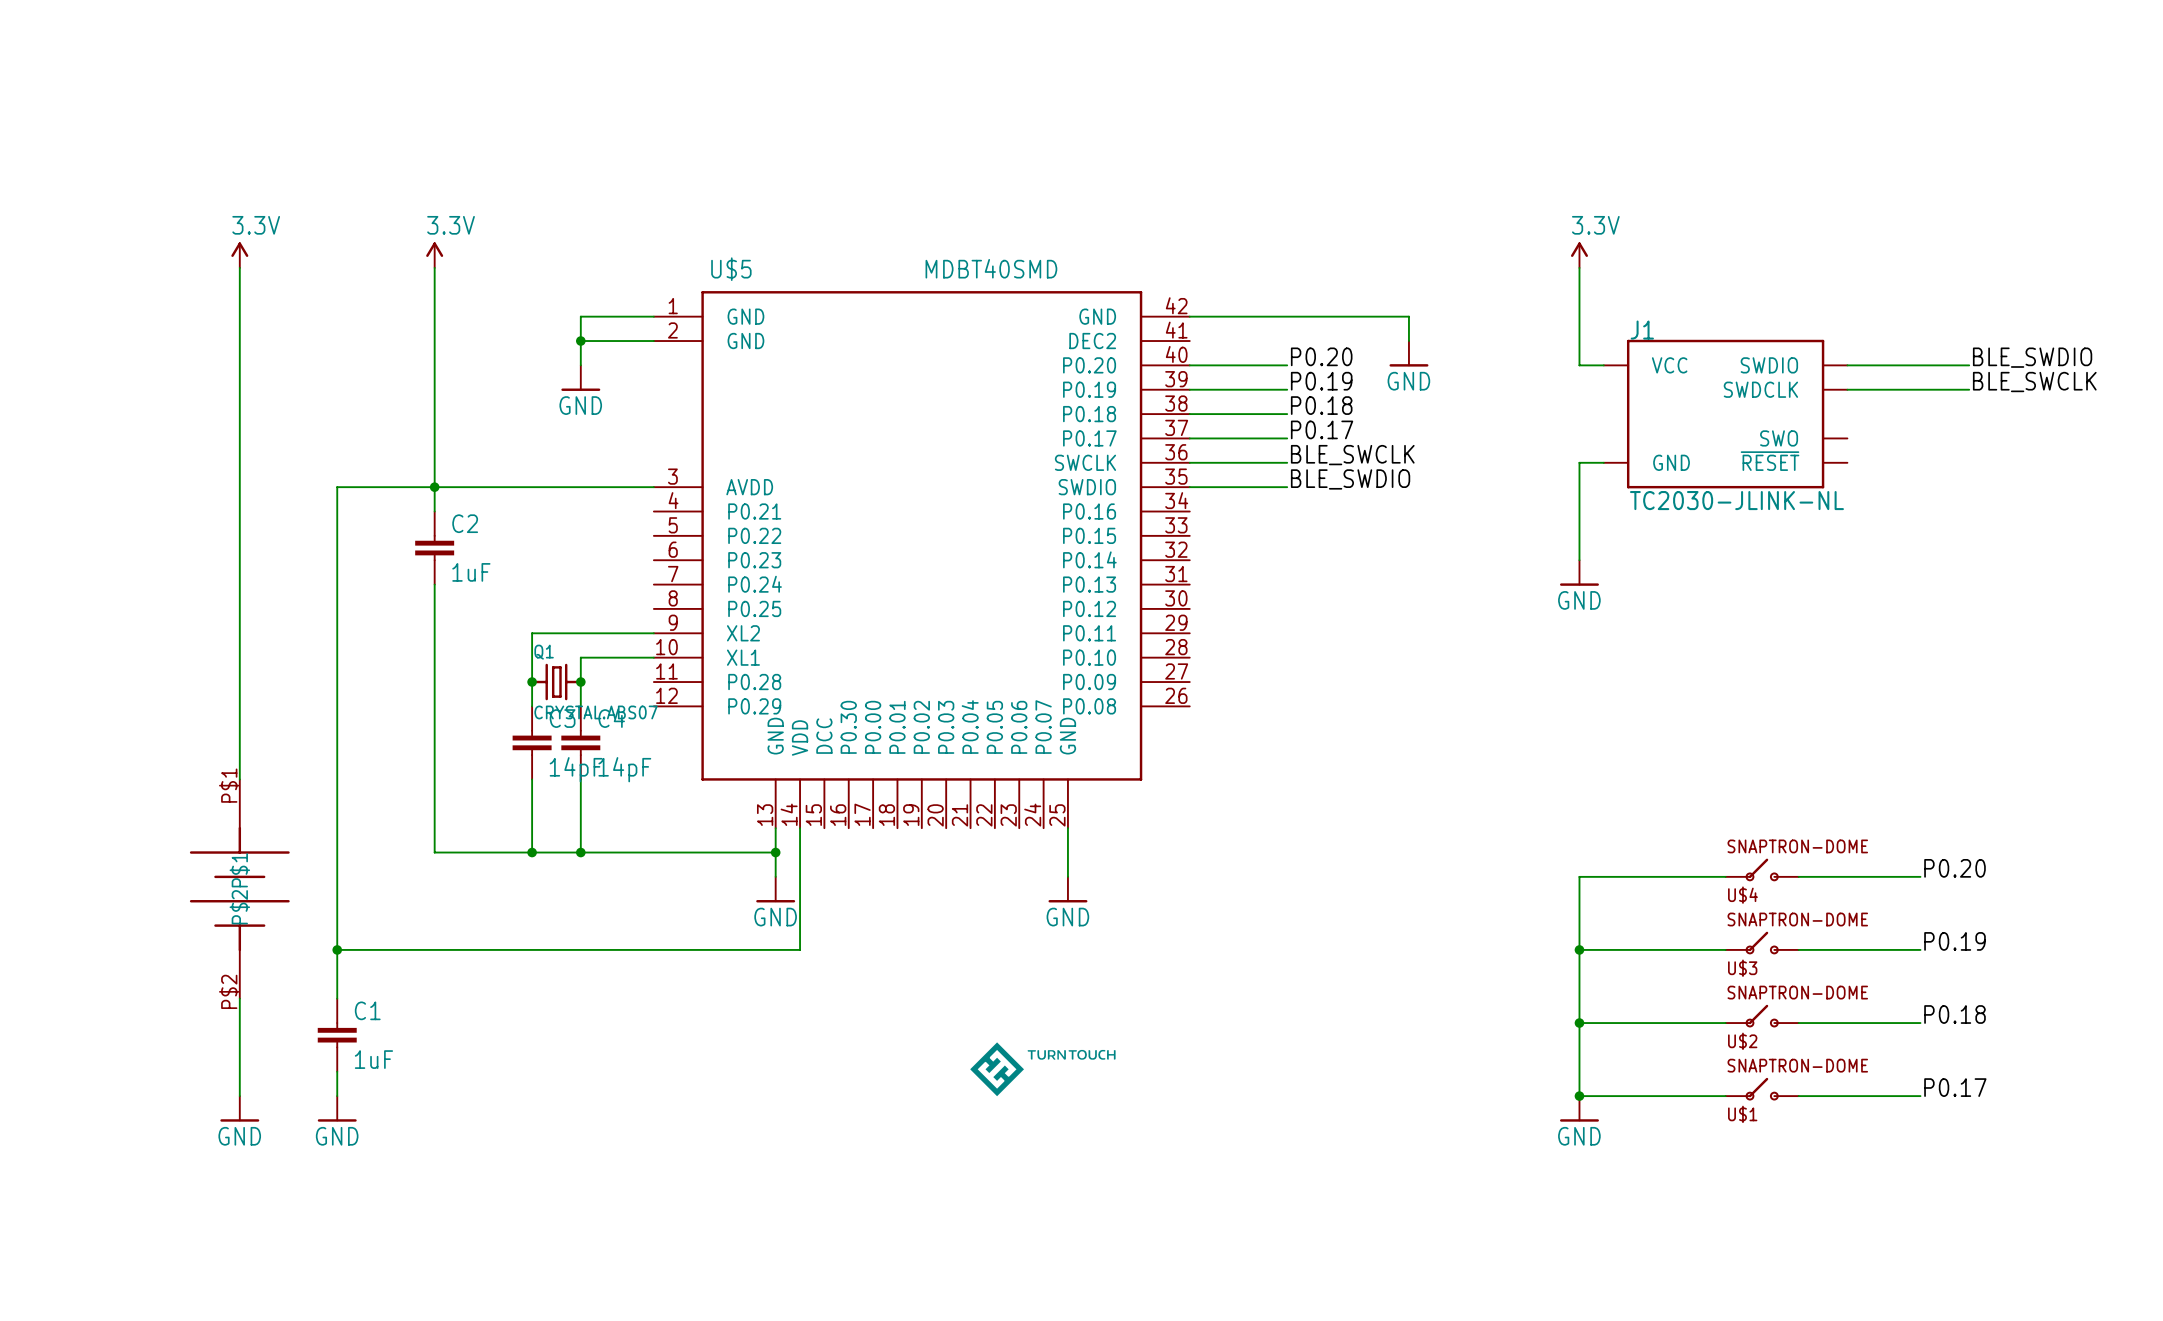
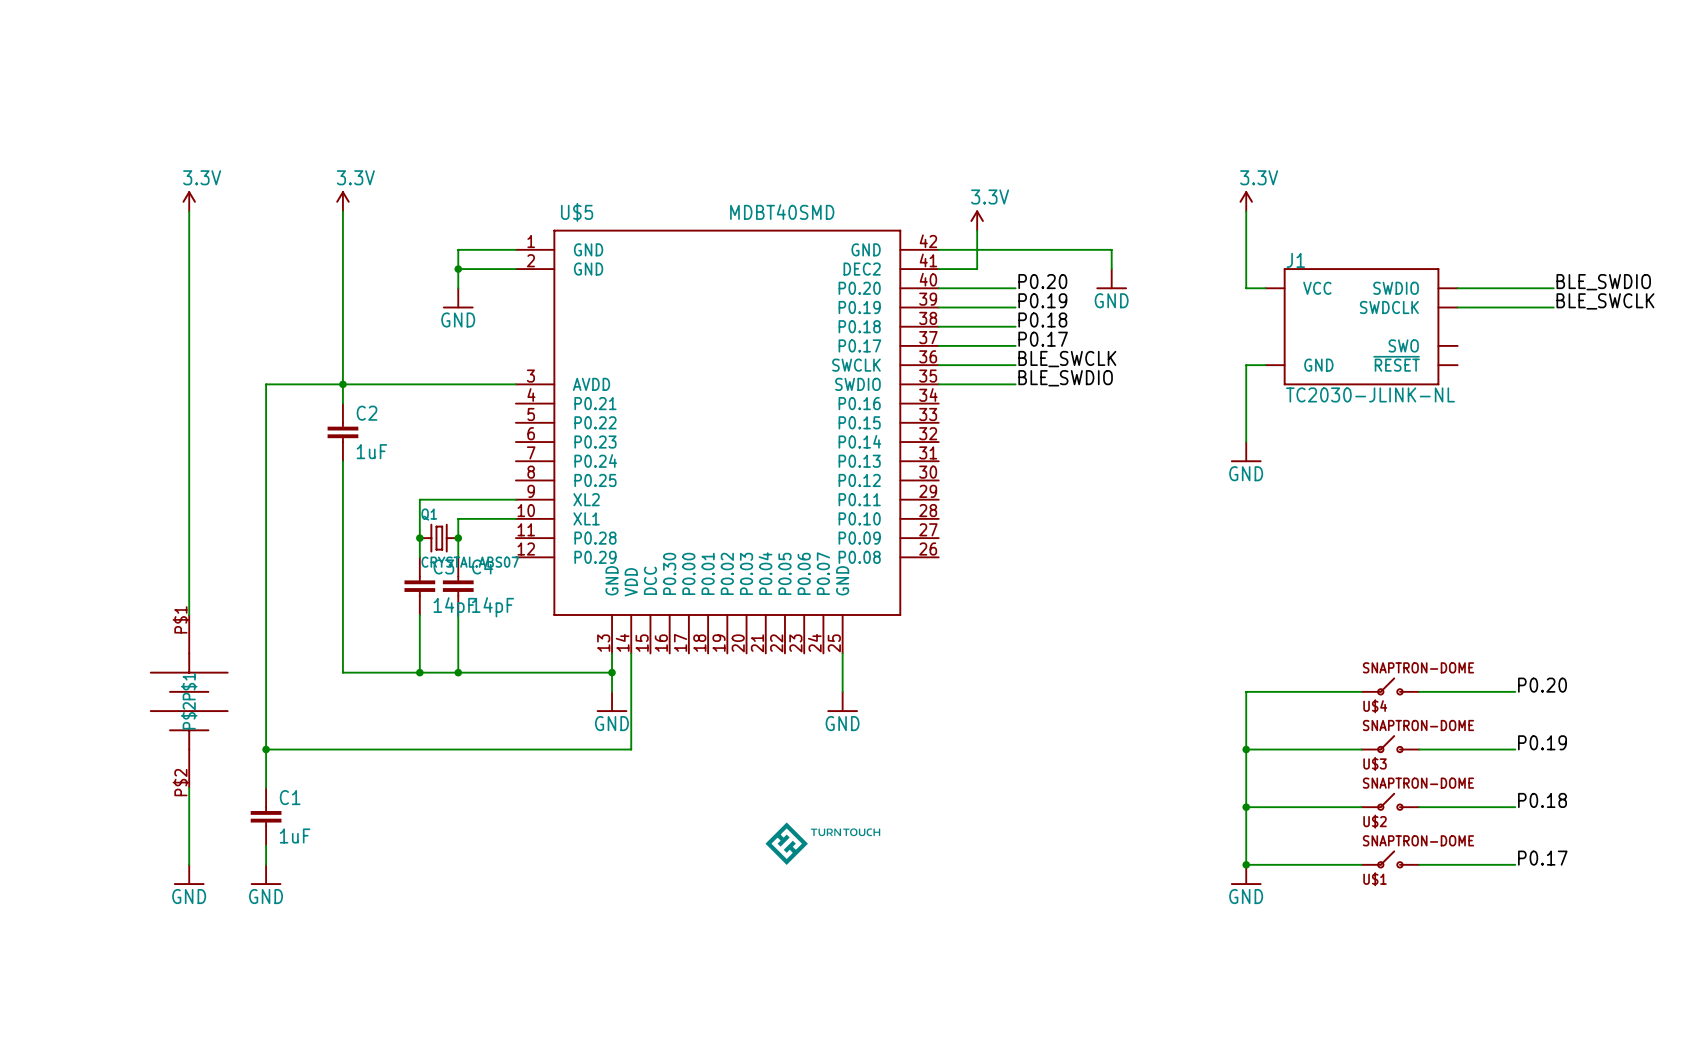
power symbol: none -> 3.3V (977, 220)
wire: none -> (977, 230) (977, 269) (938, 269)

